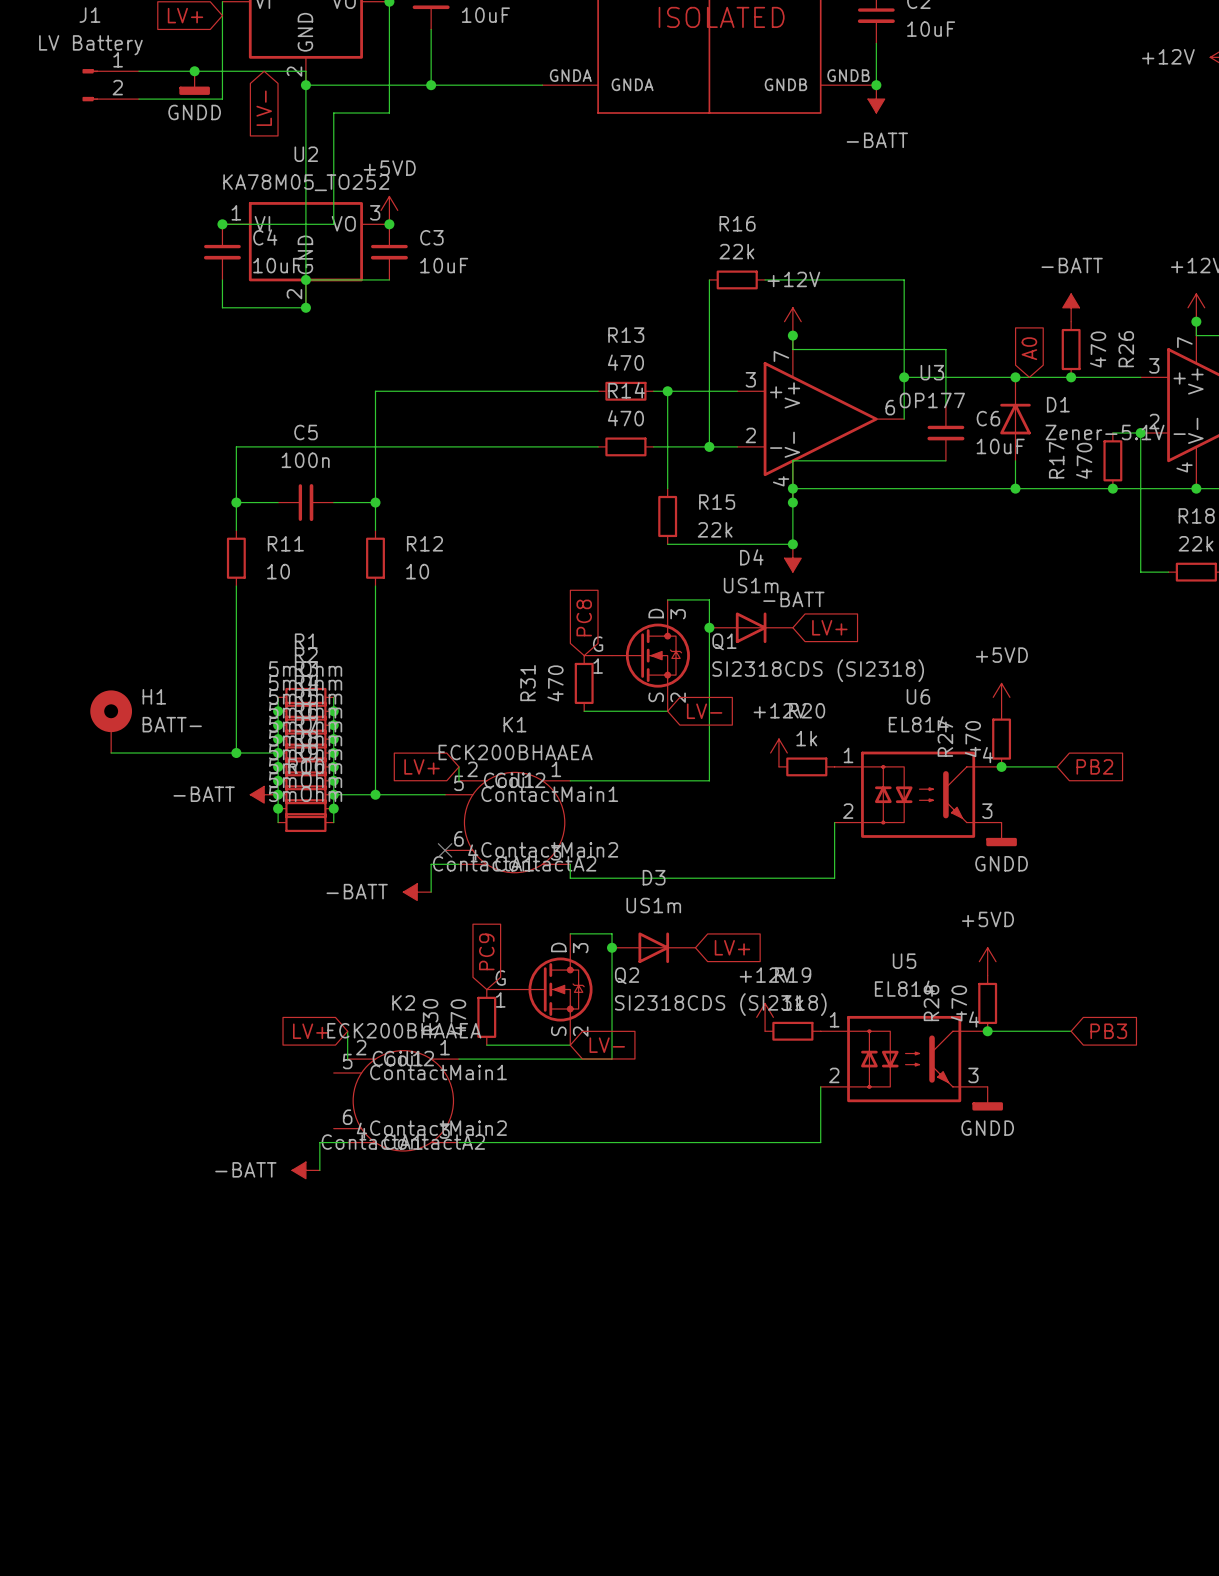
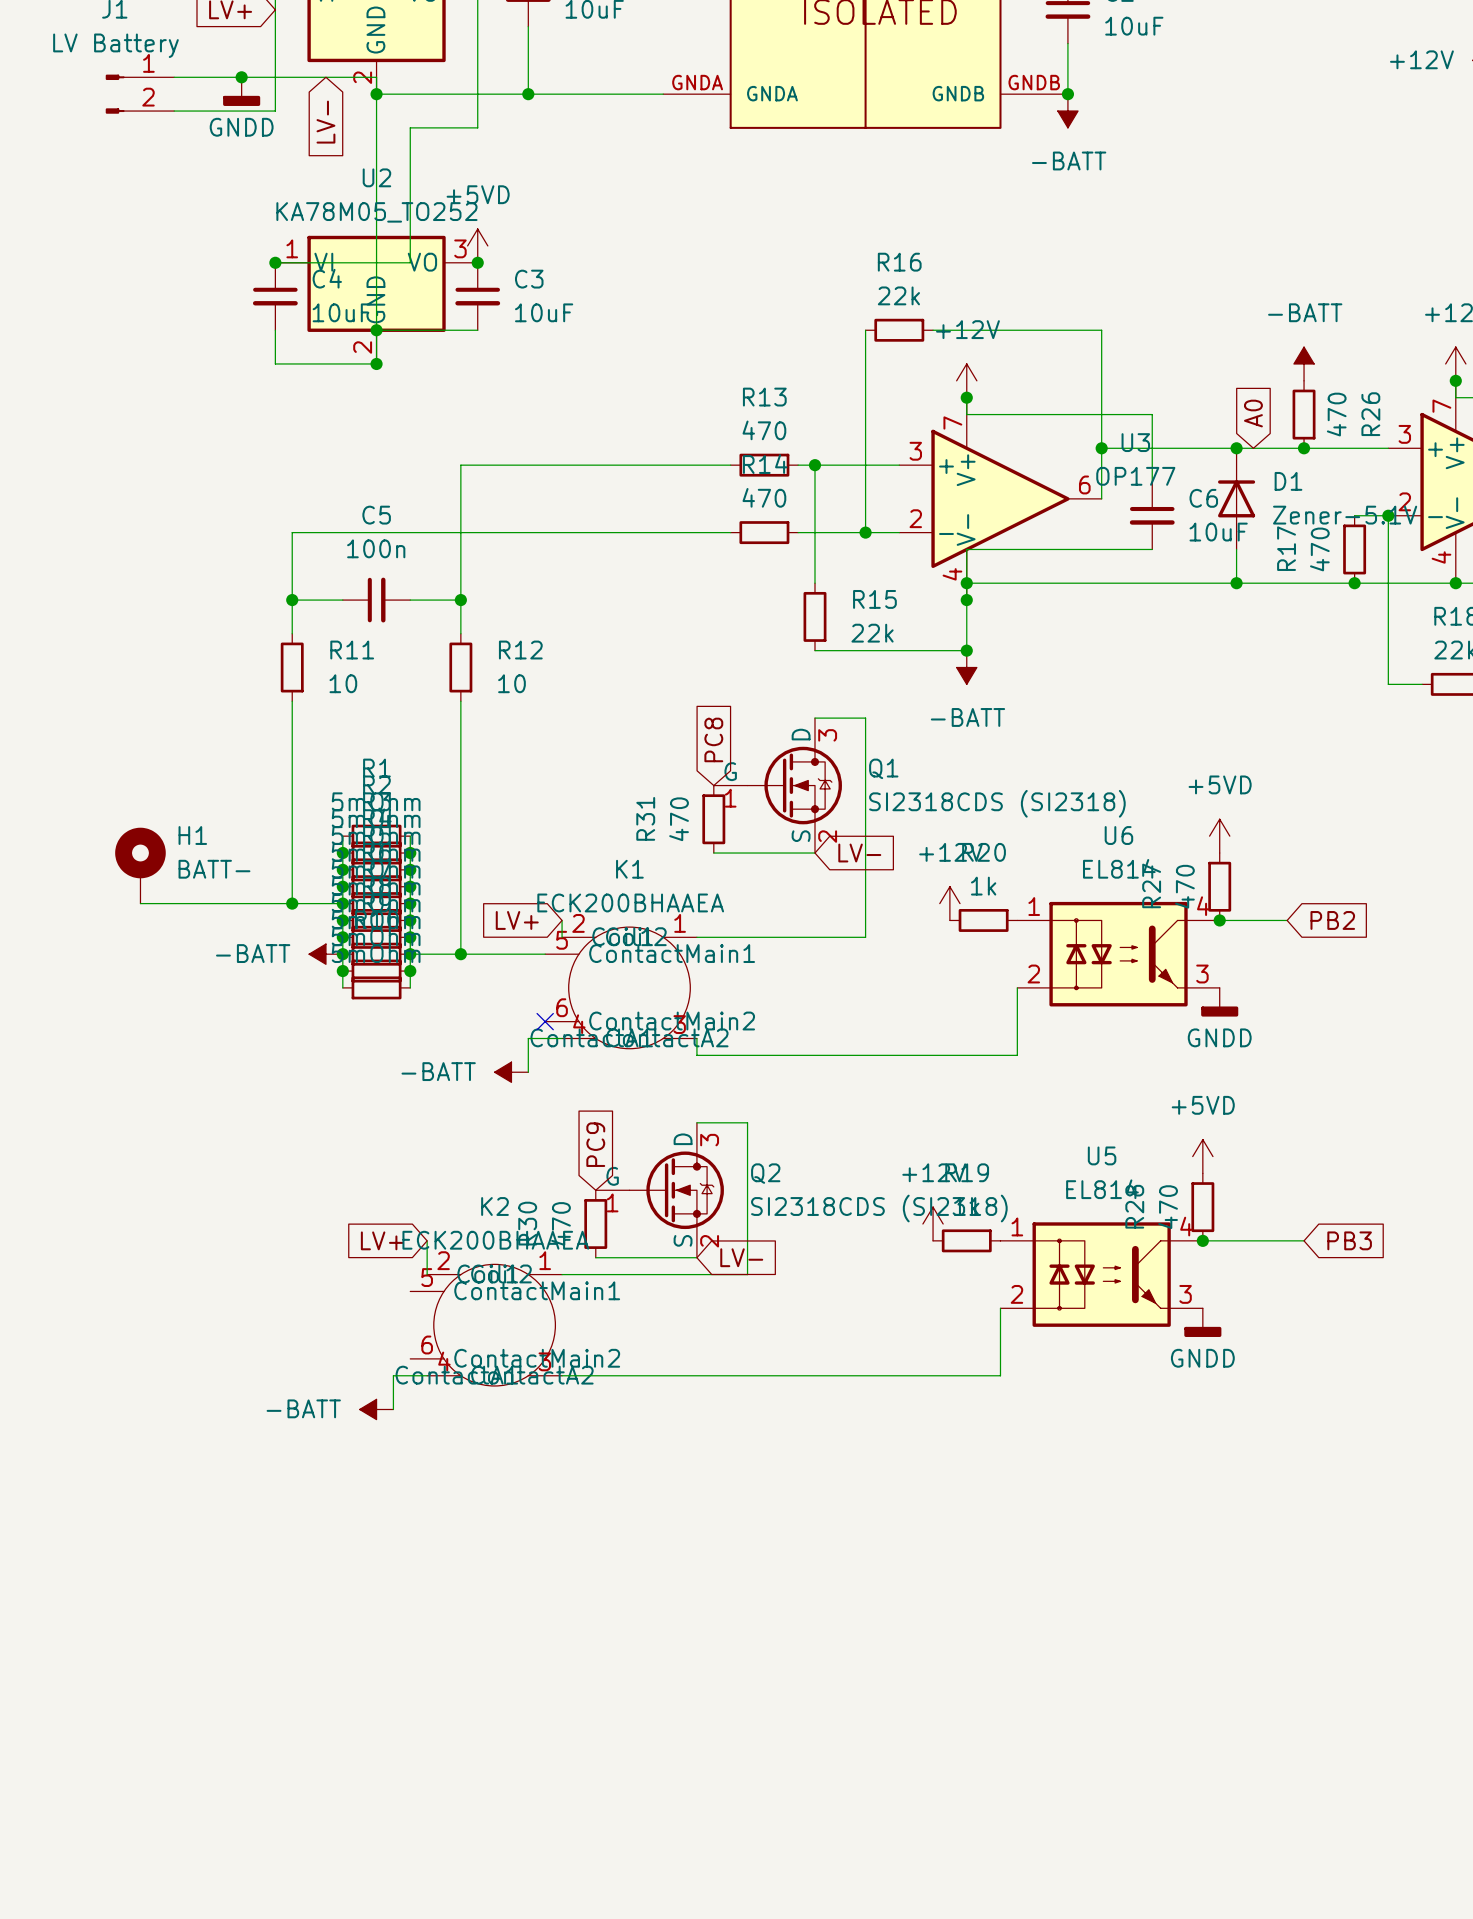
junction: (709, 627) -> none
D4: US1m (751, 627) -> none
global label: LV+ (829, 627) -> none
junction: (612, 947) -> none
D3: US1m (653, 947) -> none
global label: LV+ (732, 947) -> none

